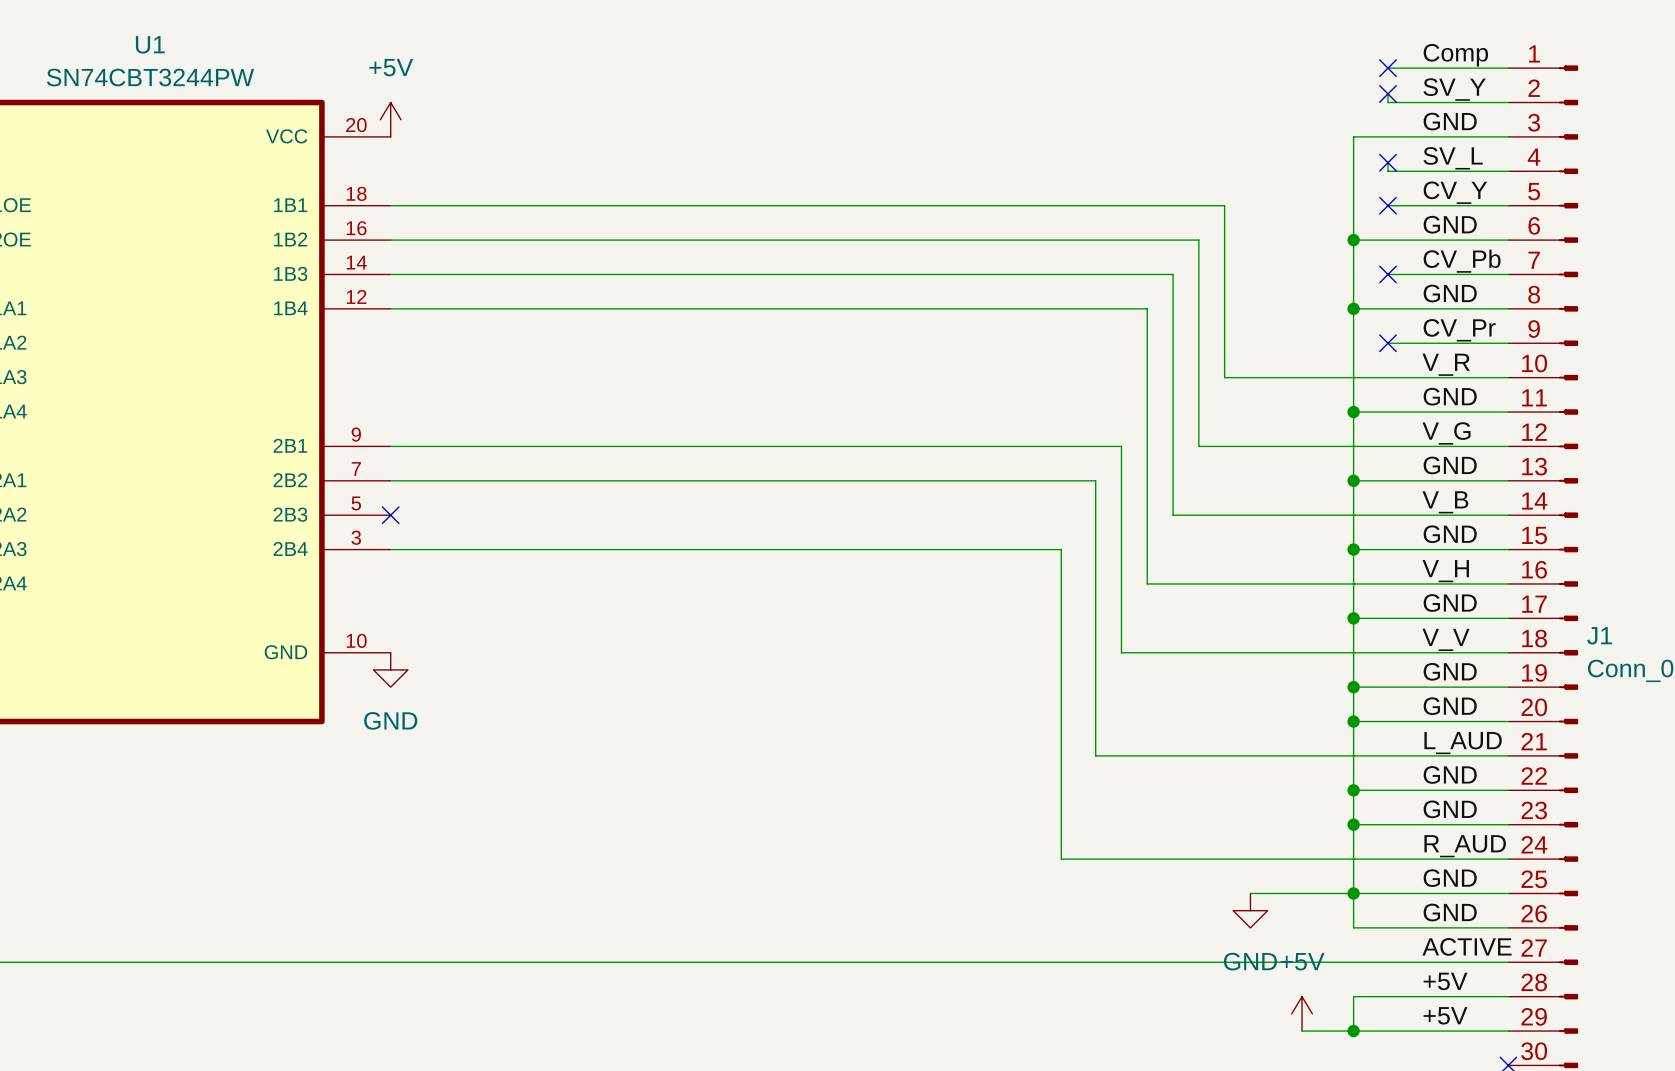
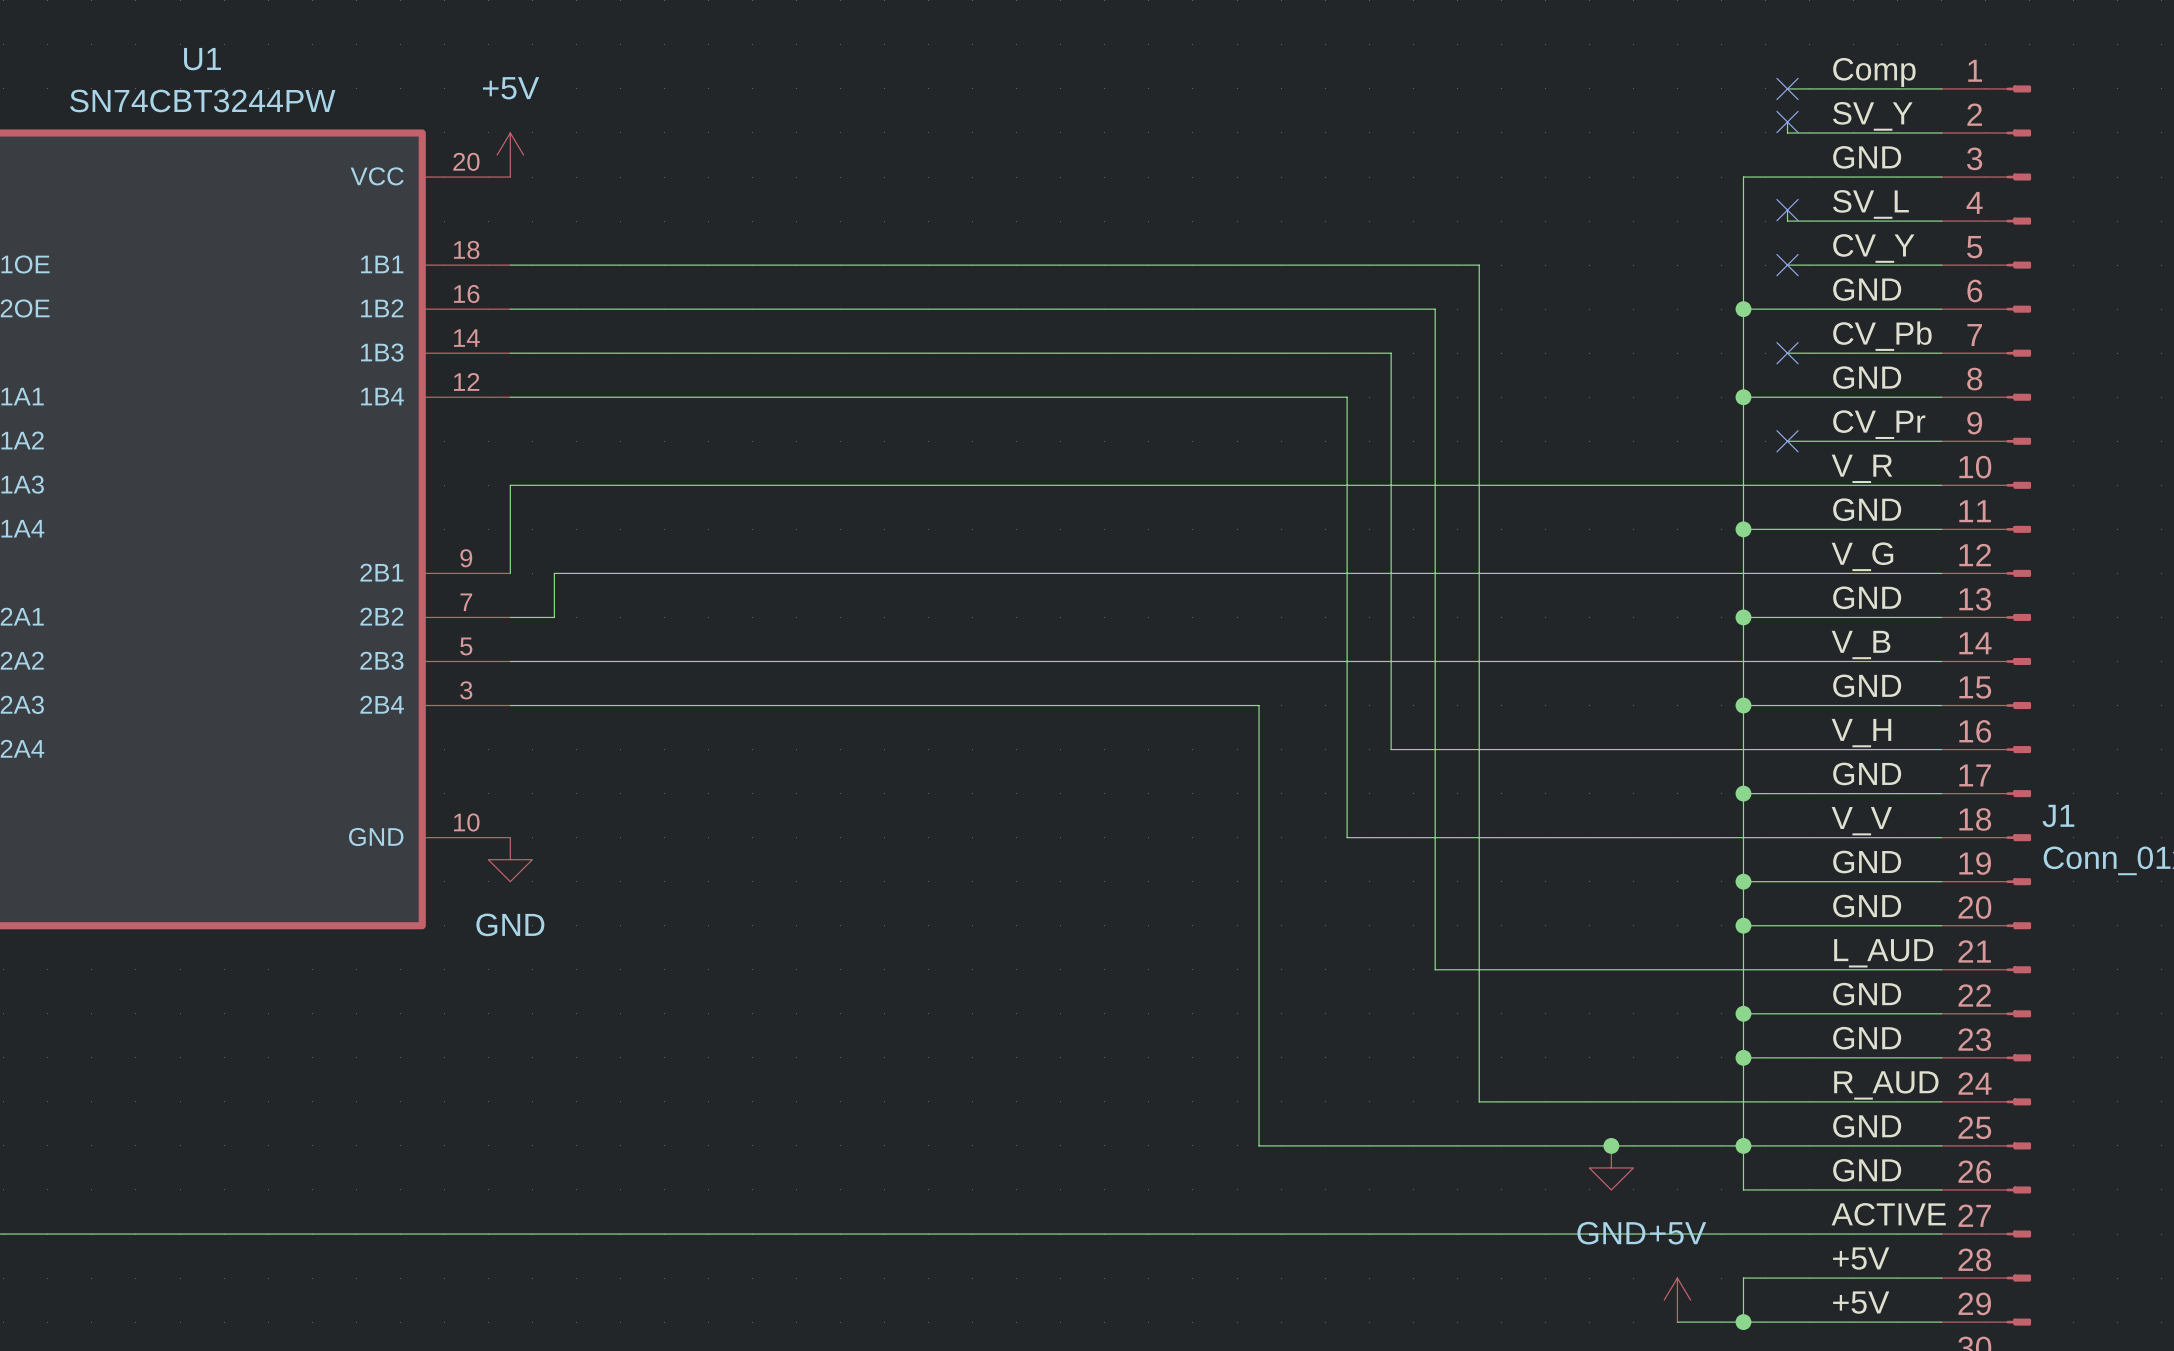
wire: (1147, 205) (1224, 205) (1224, 377) -> (1479, 265) (1479, 397)
wire: (1112, 240) (1198, 240) (1198, 446) -> (1446, 573) (1545, 573)
wire: (1078, 274) (1173, 274) (1173, 515) -> (1391, 353) (1391, 749) (1479, 749) (1479, 1101)
wire: (1044, 308) (1147, 308) -> none
wire: none -> (1578, 485) (510, 485) (510, 573)
wire: (390, 446) (425, 446) -> (554, 617) (554, 573)
wire: (1121, 446) (1121, 652) -> (1347, 397) (1347, 837) (1446, 837)
wire: (425, 480) (1095, 480) (1095, 755) (1112, 755) -> (1435, 309) (1435, 969)
wire: none -> (510, 661) (1512, 661)
no-connect mark: (390, 515) -> none
wire: (975, 549) (1061, 549) (1061, 859) (1147, 859) -> (1259, 705) (1259, 1145) (1611, 1145)
junction: none -> (1611, 1145)

